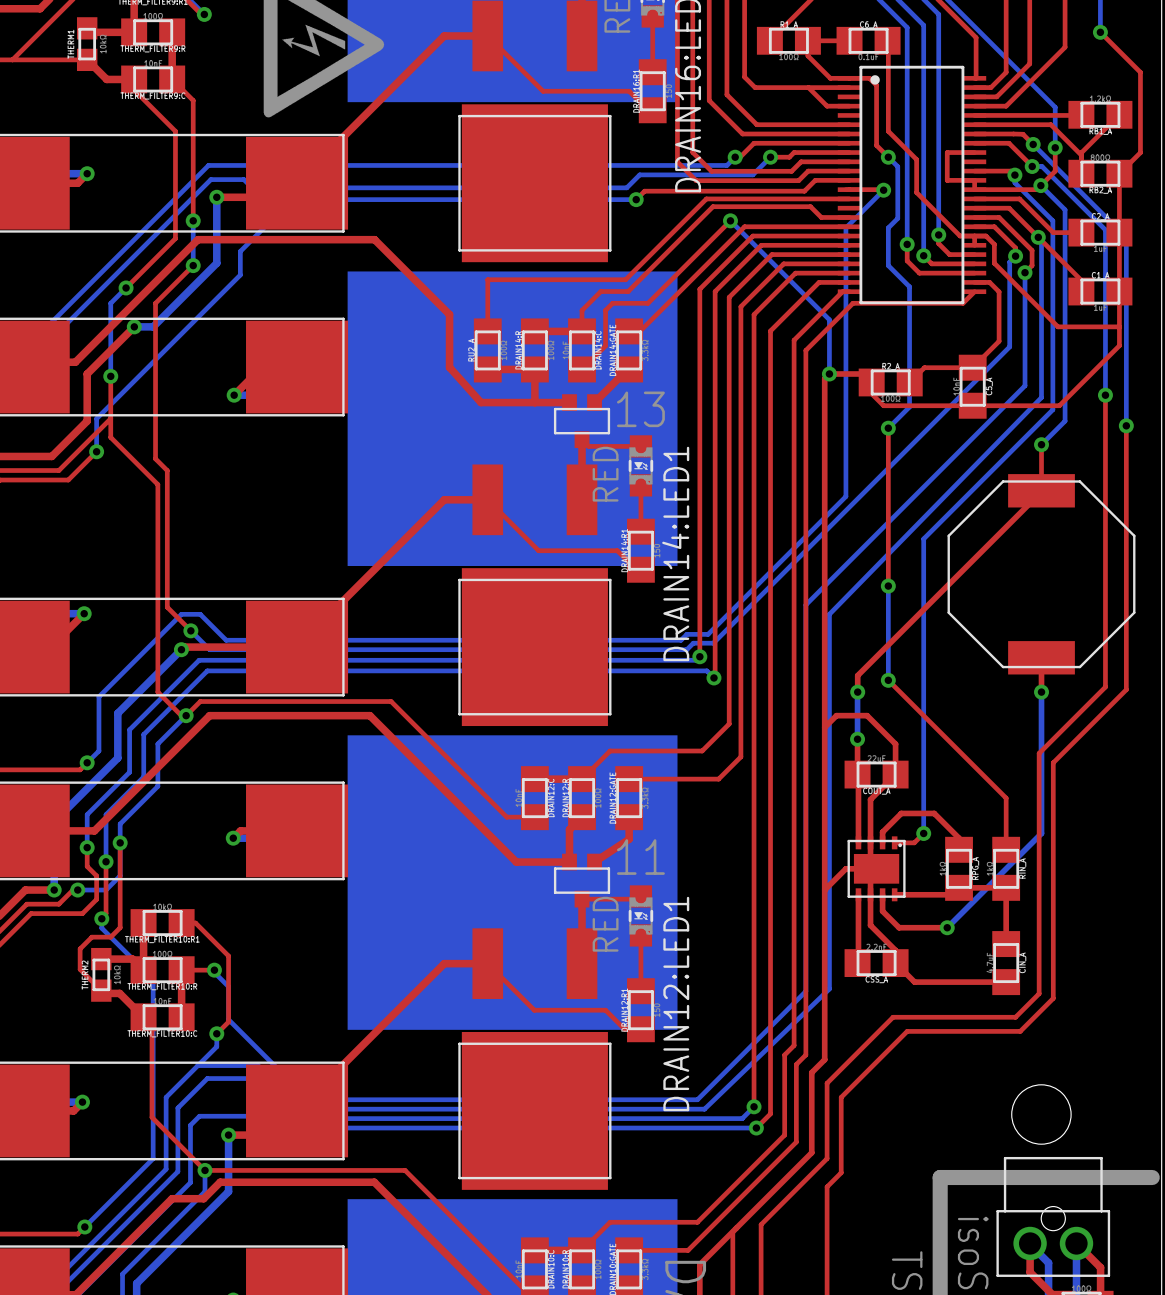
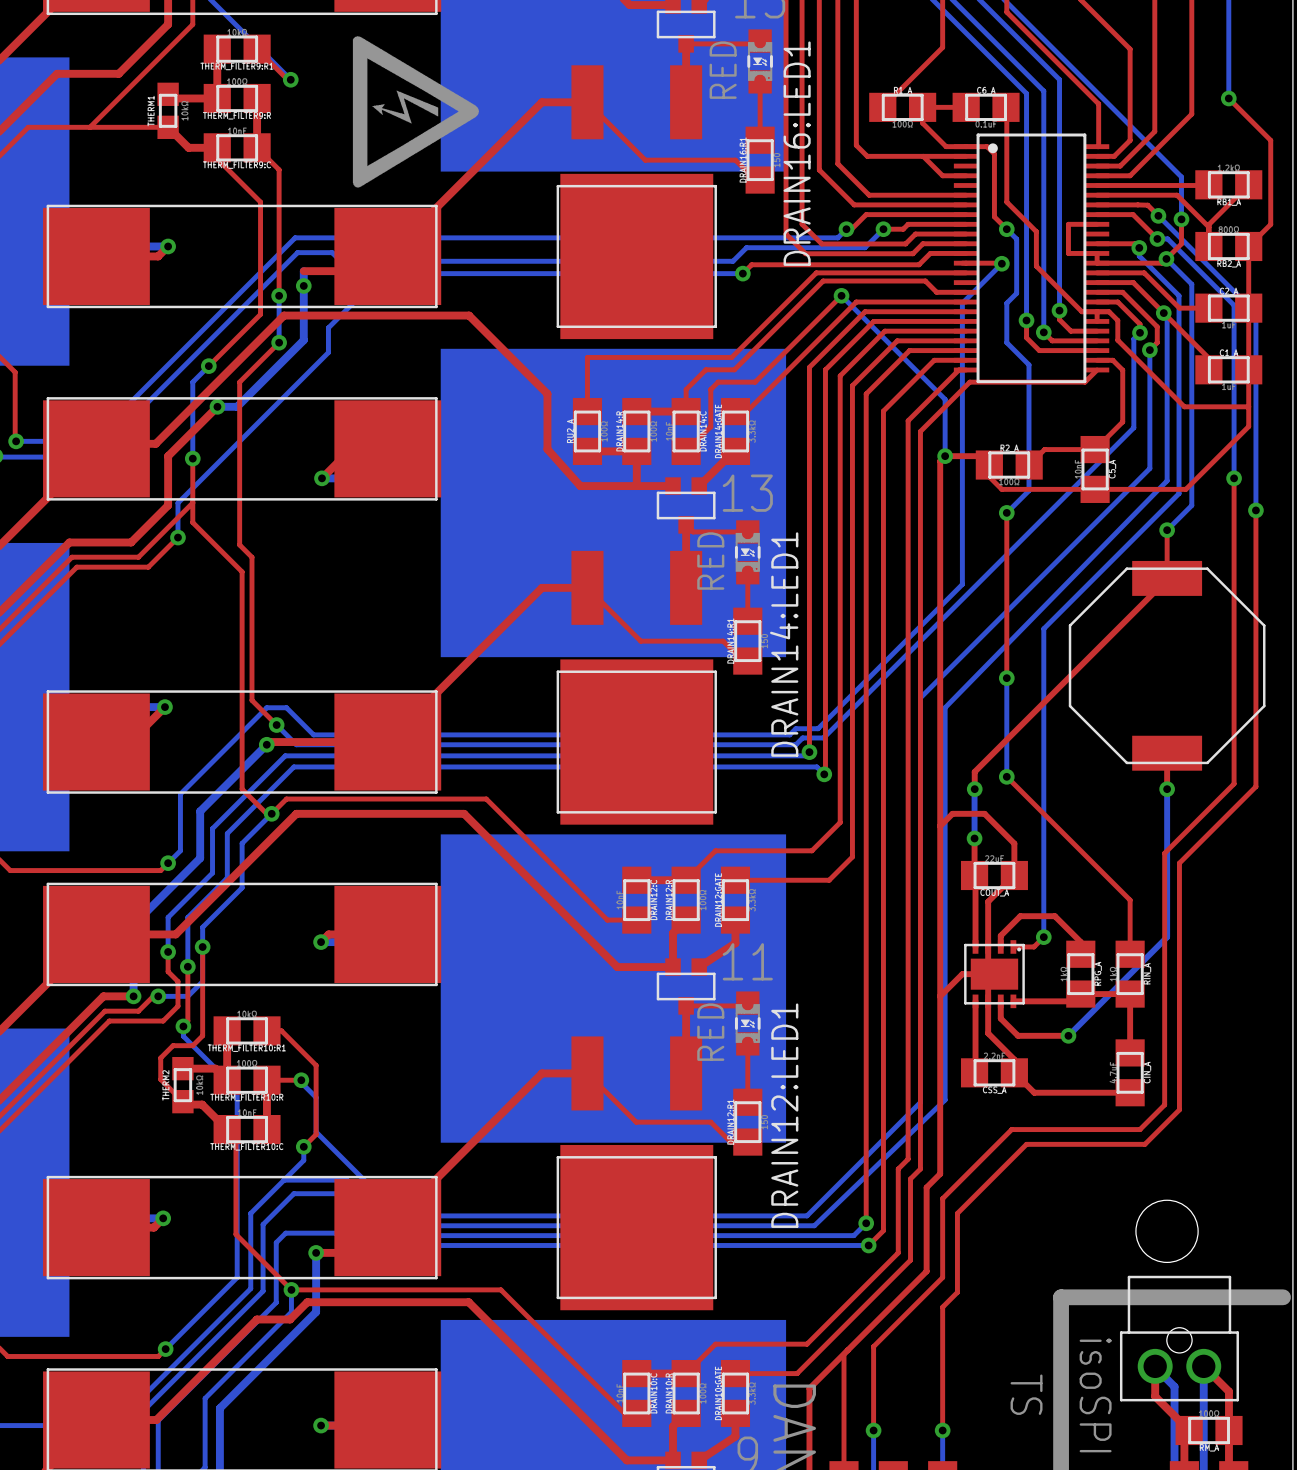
via position: (216, 197) -> (303, 285)

